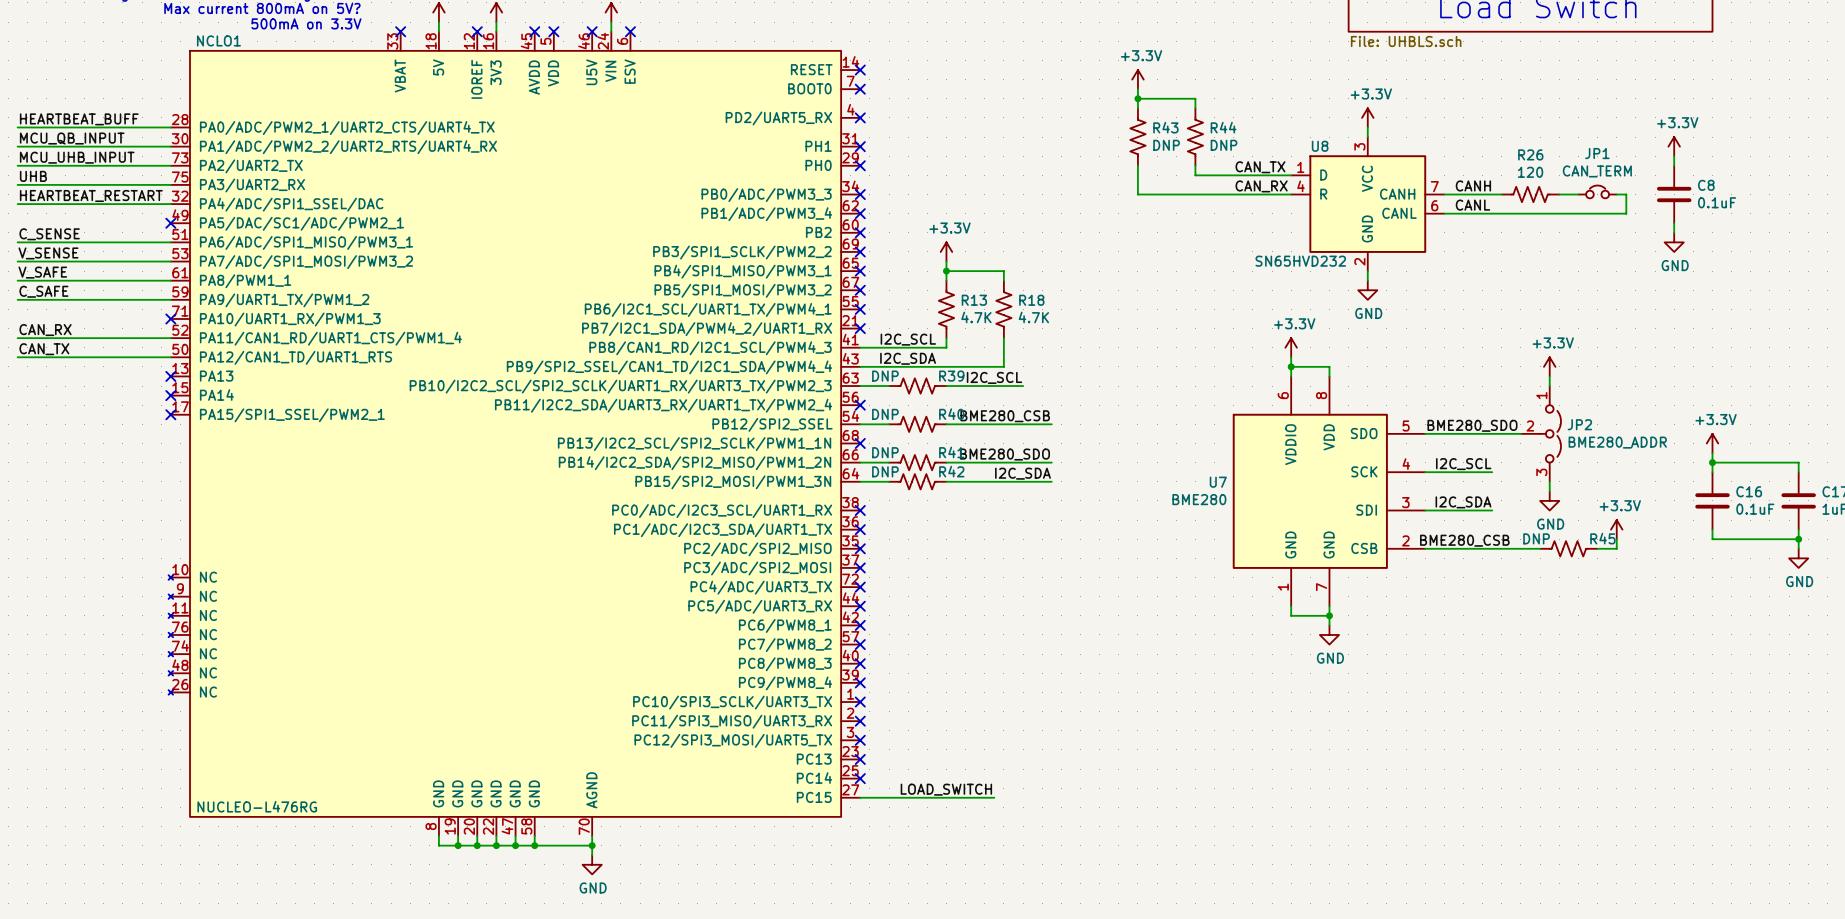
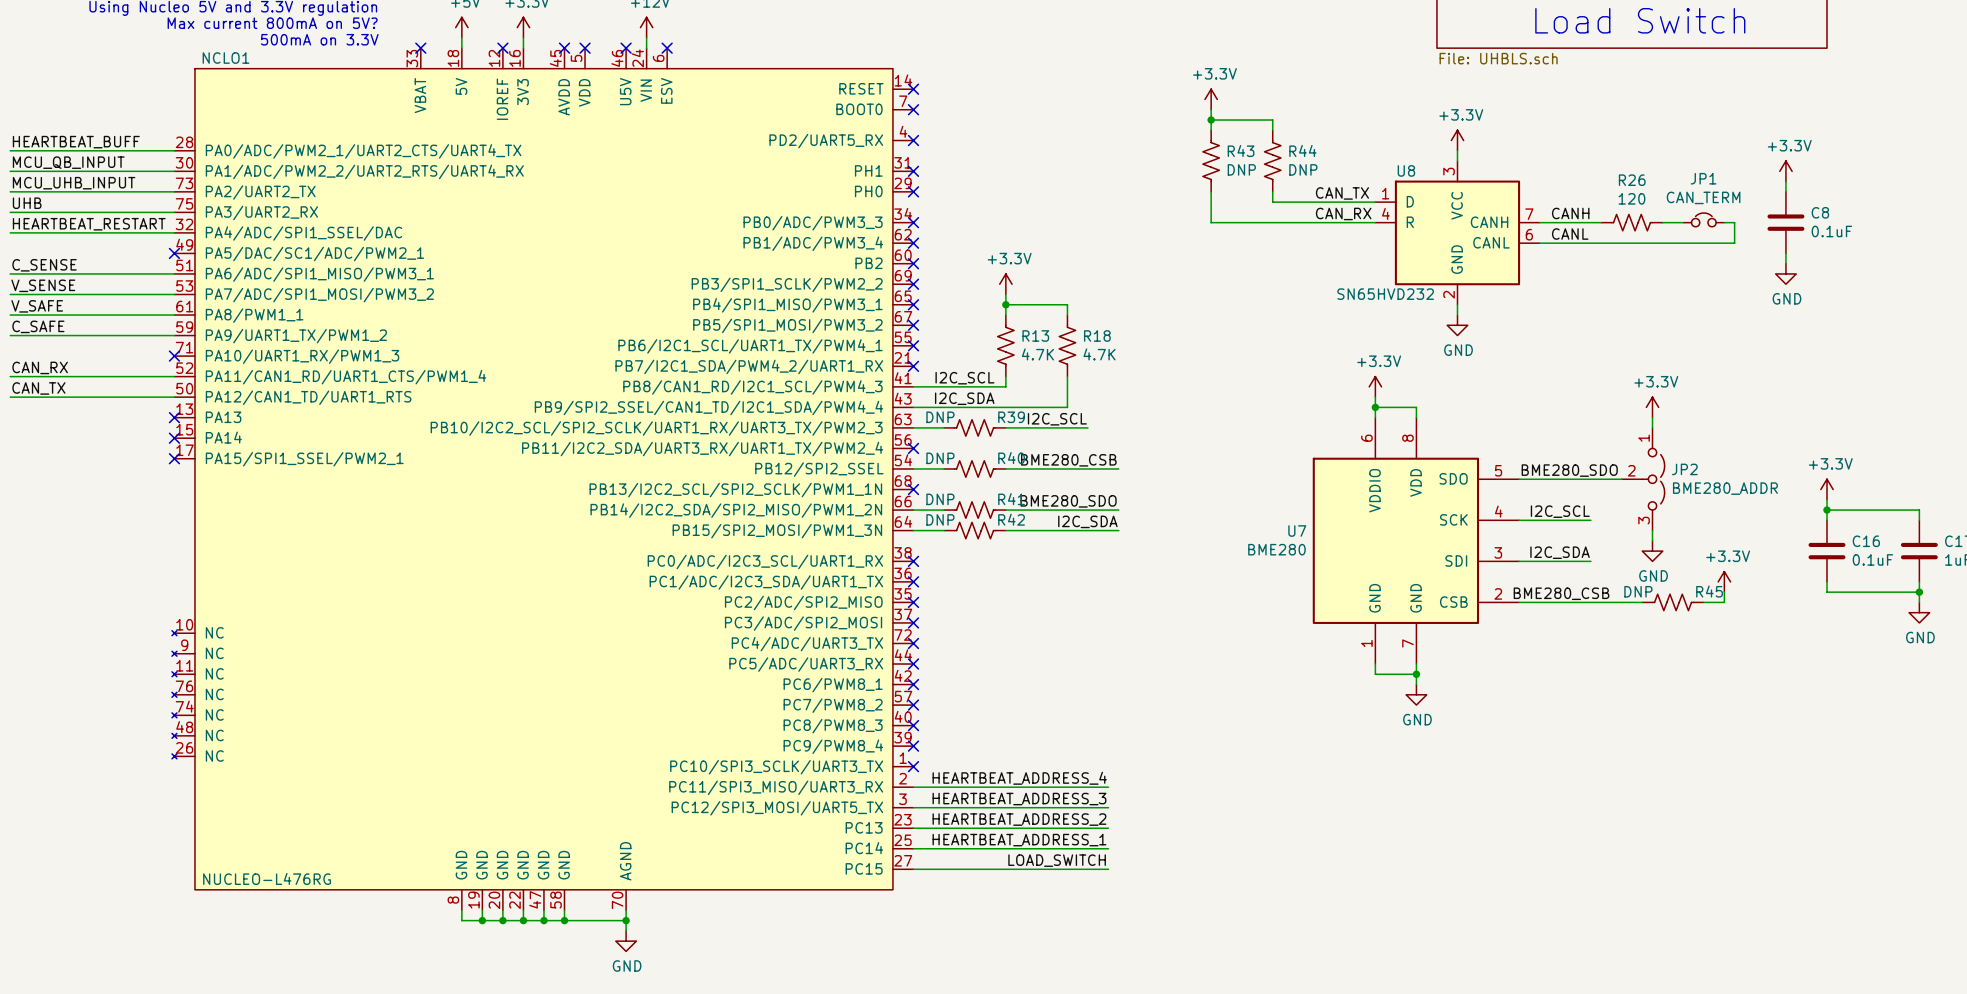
label: none -> HEARTBEAT_ADDRESS_4 (1019, 778)
wire: none -> (913, 787) (1108, 787)
no-connect mark: (860, 721) -> none
label: none -> HEARTBEAT_ADDRESS_3 (1019, 799)
wire: none -> (913, 807) (1108, 807)
no-connect mark: (860, 740) -> none
label: none -> HEARTBEAT_ADDRESS_2 (1019, 819)
wire: none -> (913, 828) (1108, 828)
no-connect mark: (860, 759) -> none
label: none -> HEARTBEAT_ADDRESS_1 (1019, 840)
wire: none -> (913, 848) (1108, 848)
no-connect mark: (860, 778) -> none
label position: LOAD_SWITCH (946, 789) -> LOAD_SWITCH (1057, 860)
wire: none -> (1057, 869) (1108, 869)

